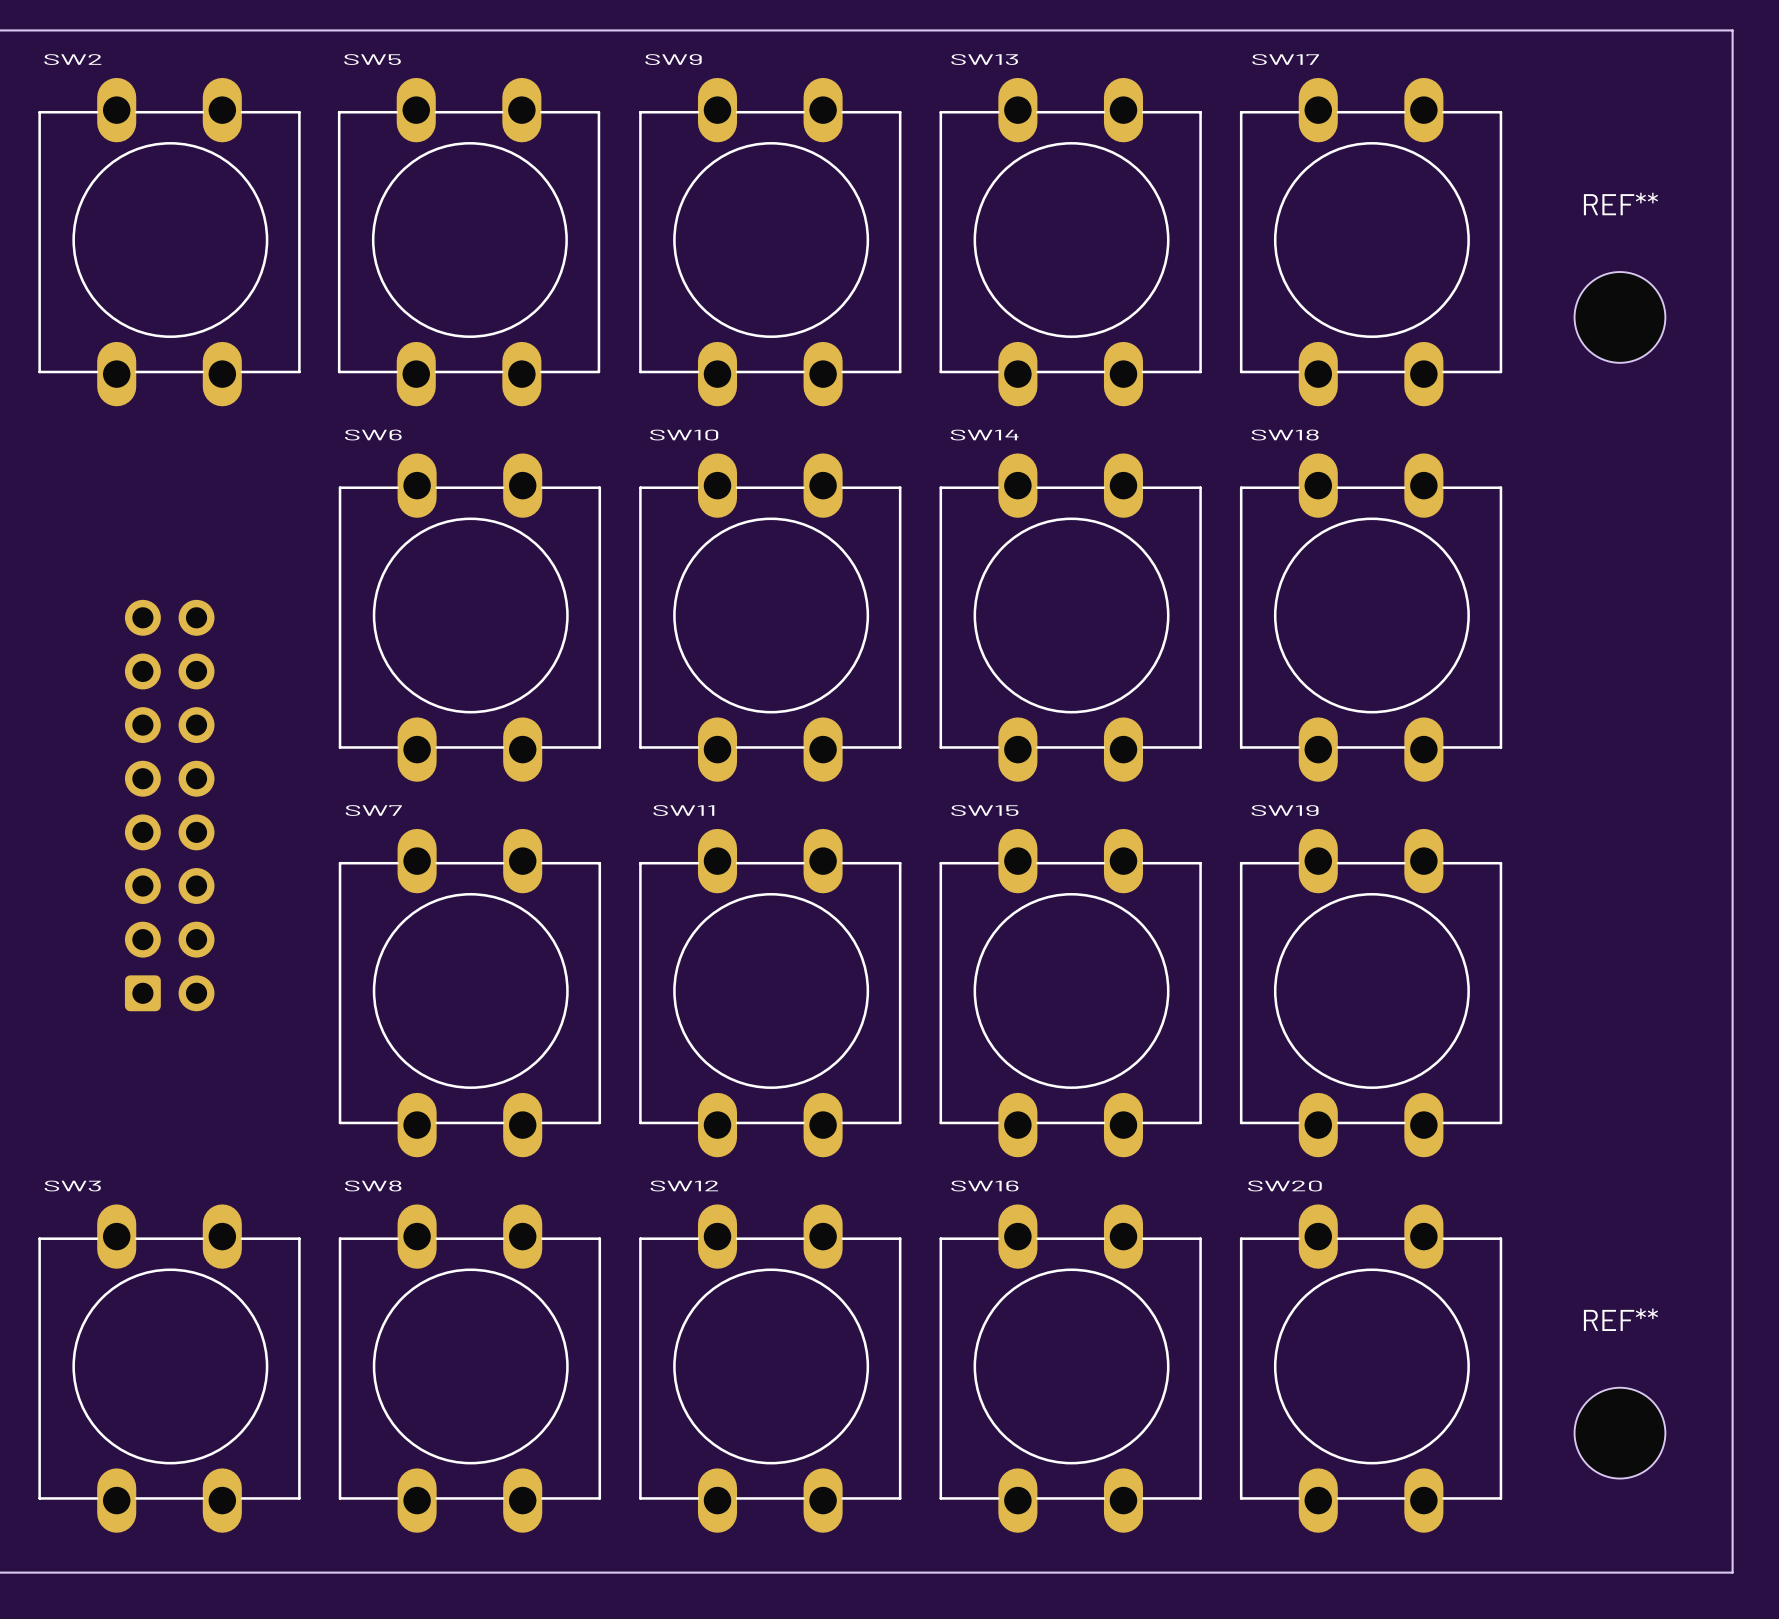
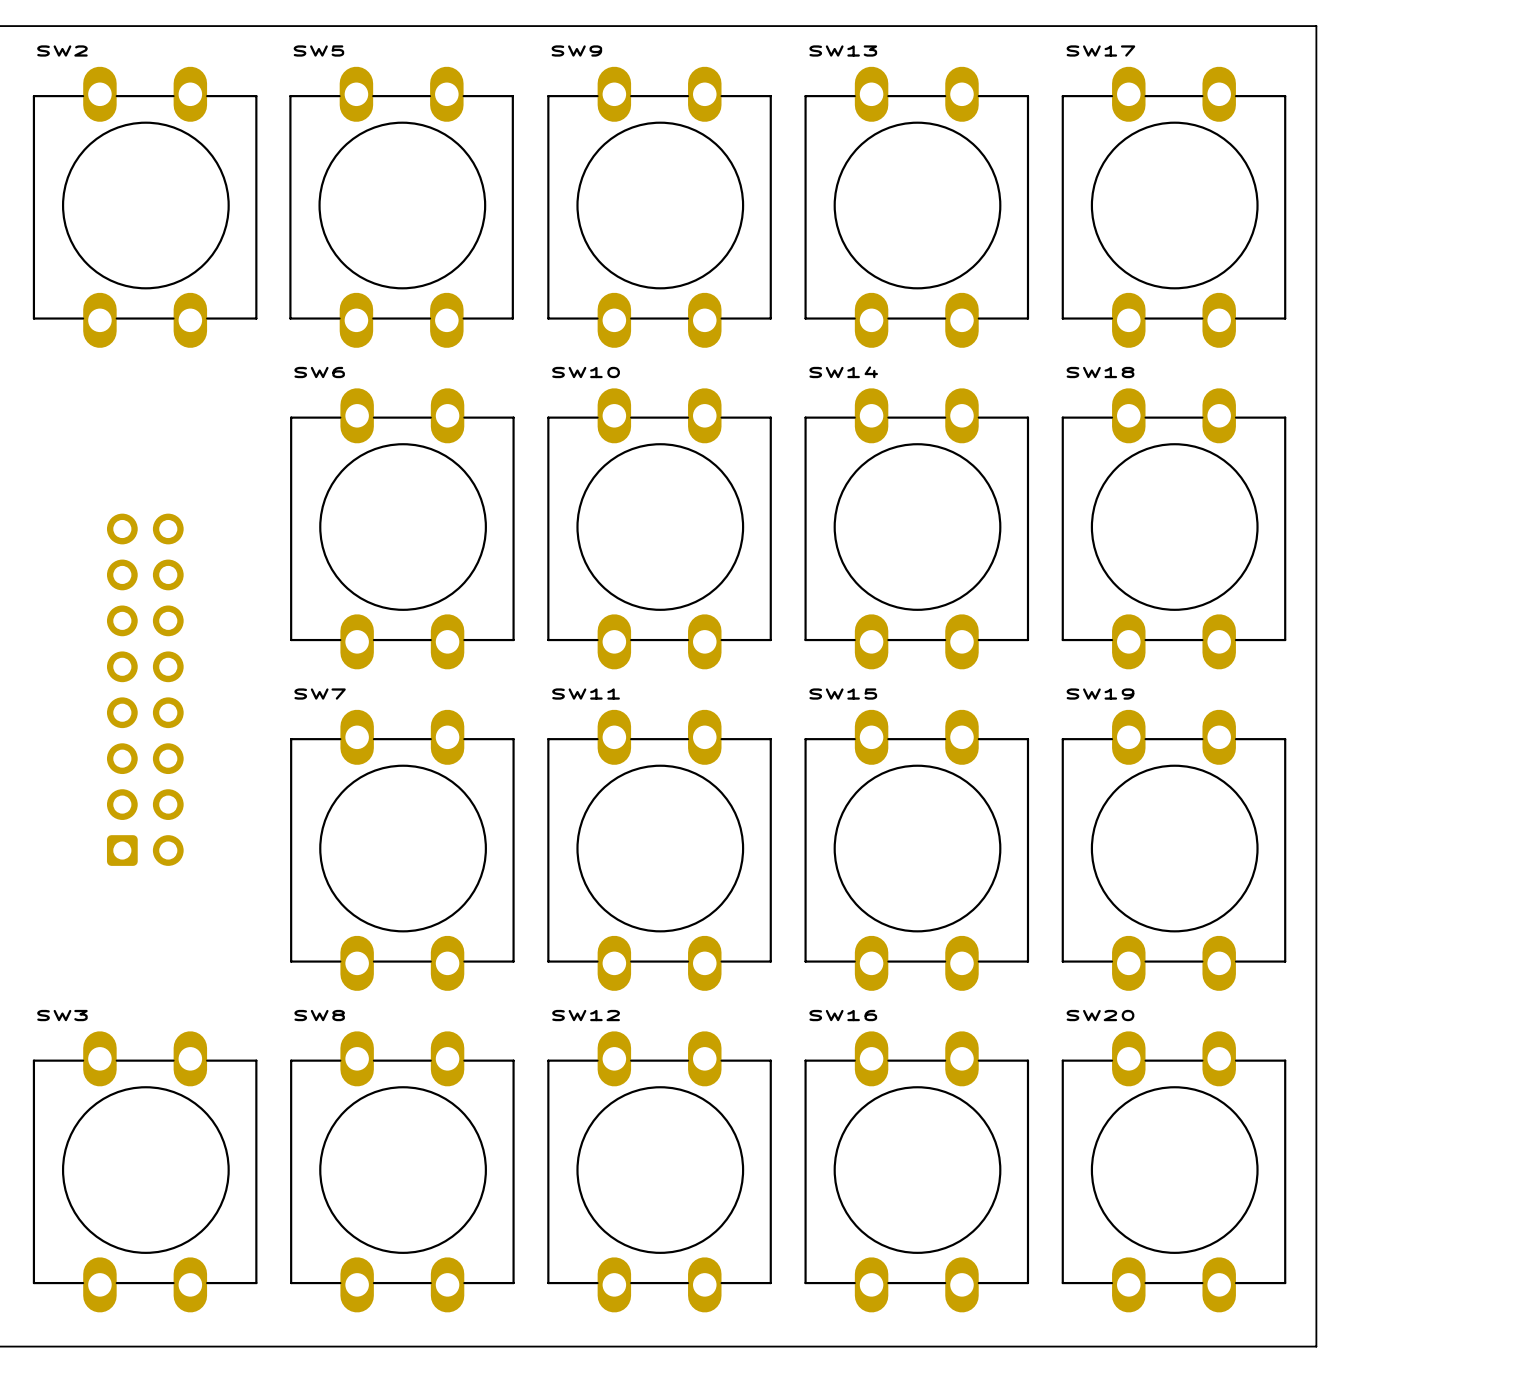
board edge: (1537, 30) (1732, 30) (1732, 1572) (1537, 1572) -> (1316, 26) (1316, 1346)
REF**: (1619, 317) -> none
REF**: (1619, 1433) -> none

